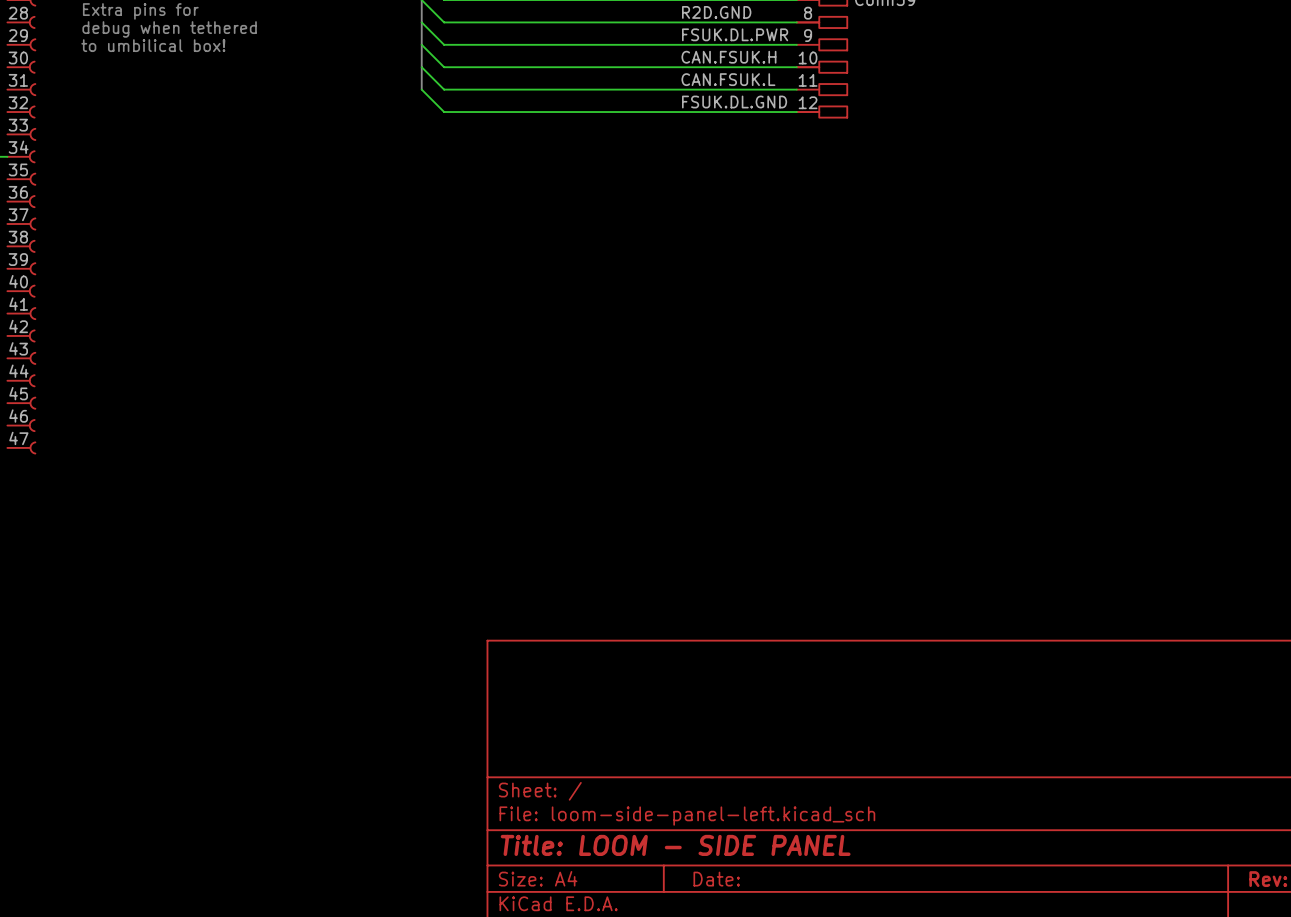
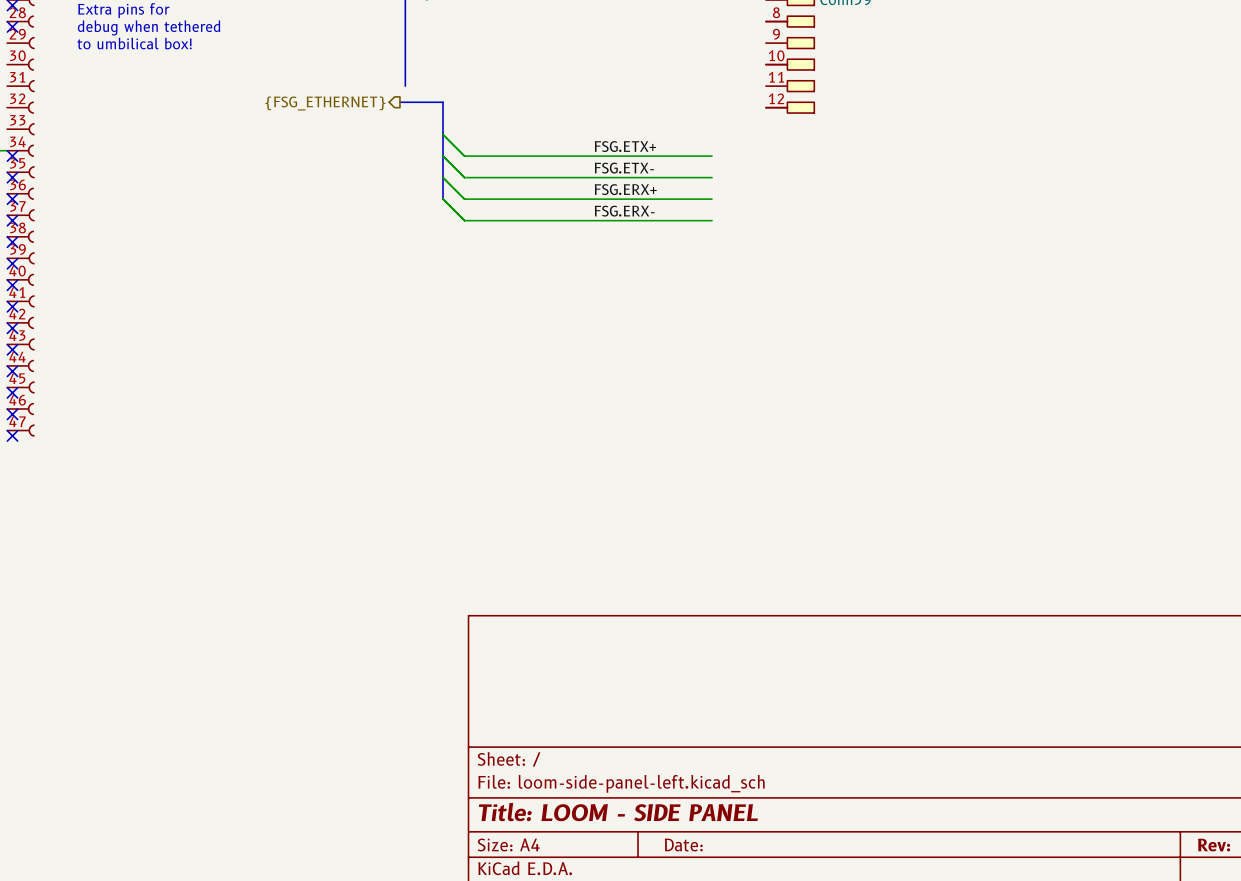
wire: (421, 0) (444, 22) -> none
wire: (444, 0) (796, 0) -> none
no-connect mark: none -> (12, 5)
label: R2D.GND (716, 12) -> none
wire: (421, 22) (444, 44) -> none
wire: (444, 22) (796, 22) -> none
no-connect mark: none -> (12, 26)
label: FSUK.DL.PWR (735, 34) -> none
wire: (421, 44) (444, 67) -> none
wire: (444, 44) (796, 44) -> none
label: CAN.FSUK.H (728, 57) -> none
wire: (421, 67) (444, 89) -> none
wire: (444, 67) (796, 67) -> none
label: CAN.FSUK.L (728, 79) -> none
wire: (421, 89) (444, 112) -> none
wire: (444, 89) (796, 89) -> none
label: FSUK.DL.GND (734, 102) -> none
bus: none -> (399, 102) (443, 102) (443, 199)
hierarchical label: none -> {FSG_ETHERNET} (325, 103)
wire: (444, 112) (796, 112) -> none
wire: none -> (443, 134) (464, 156) (712, 156)
label: none -> FSG.ETX+ (625, 146)
no-connect mark: none -> (12, 156)
wire: none -> (443, 156) (464, 177) (712, 177)
label: none -> FSG.ETX- (624, 168)
no-connect mark: none -> (12, 177)
wire: none -> (443, 177) (464, 199) (712, 199)
label: none -> FSG.ERX+ (625, 189)
no-connect mark: none -> (12, 199)
wire: none -> (443, 199) (464, 220) (712, 220)
label: none -> FSG.ERX- (624, 211)
no-connect mark: none -> (12, 220)
no-connect mark: none -> (12, 242)
no-connect mark: none -> (12, 263)
no-connect mark: none -> (12, 285)
no-connect mark: none -> (12, 306)
no-connect mark: none -> (12, 328)
no-connect mark: none -> (12, 349)
no-connect mark: none -> (12, 371)
no-connect mark: none -> (12, 392)
no-connect mark: none -> (12, 414)
no-connect mark: none -> (12, 435)

